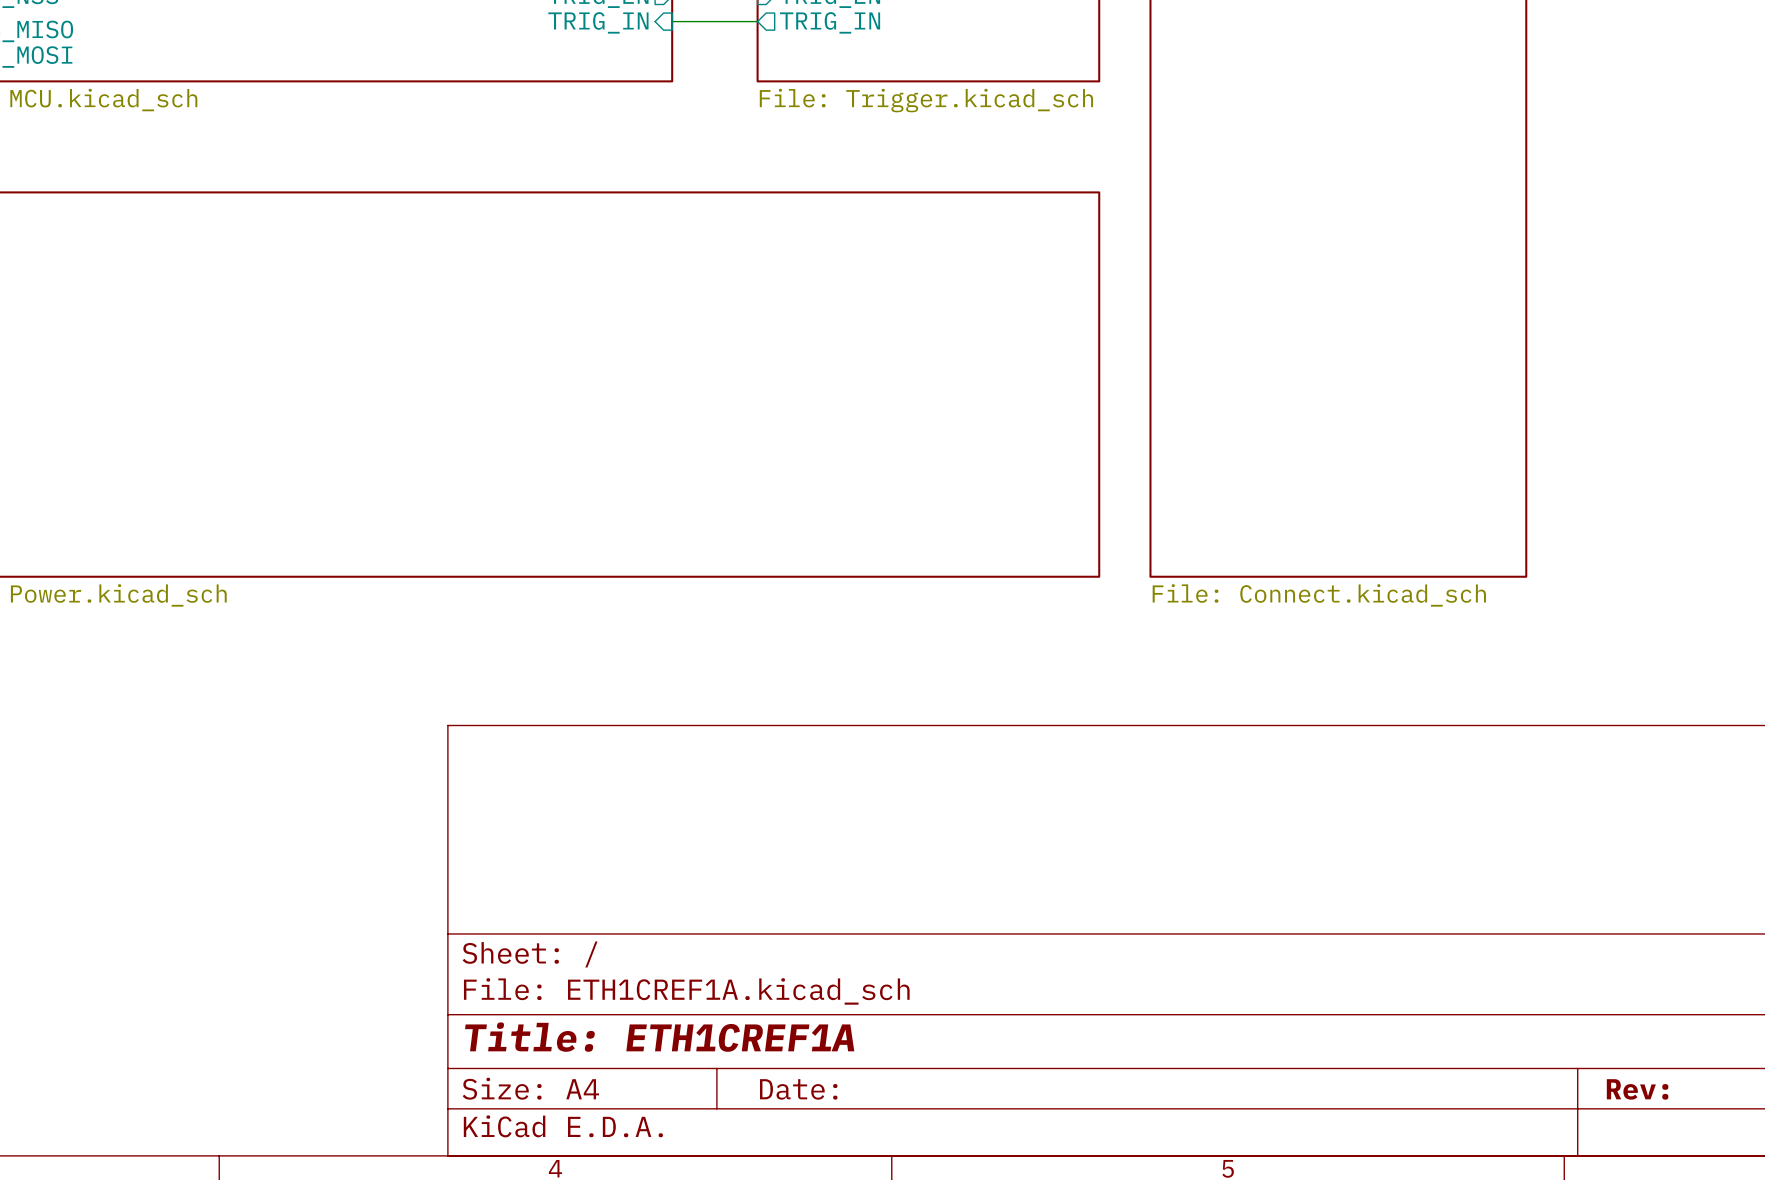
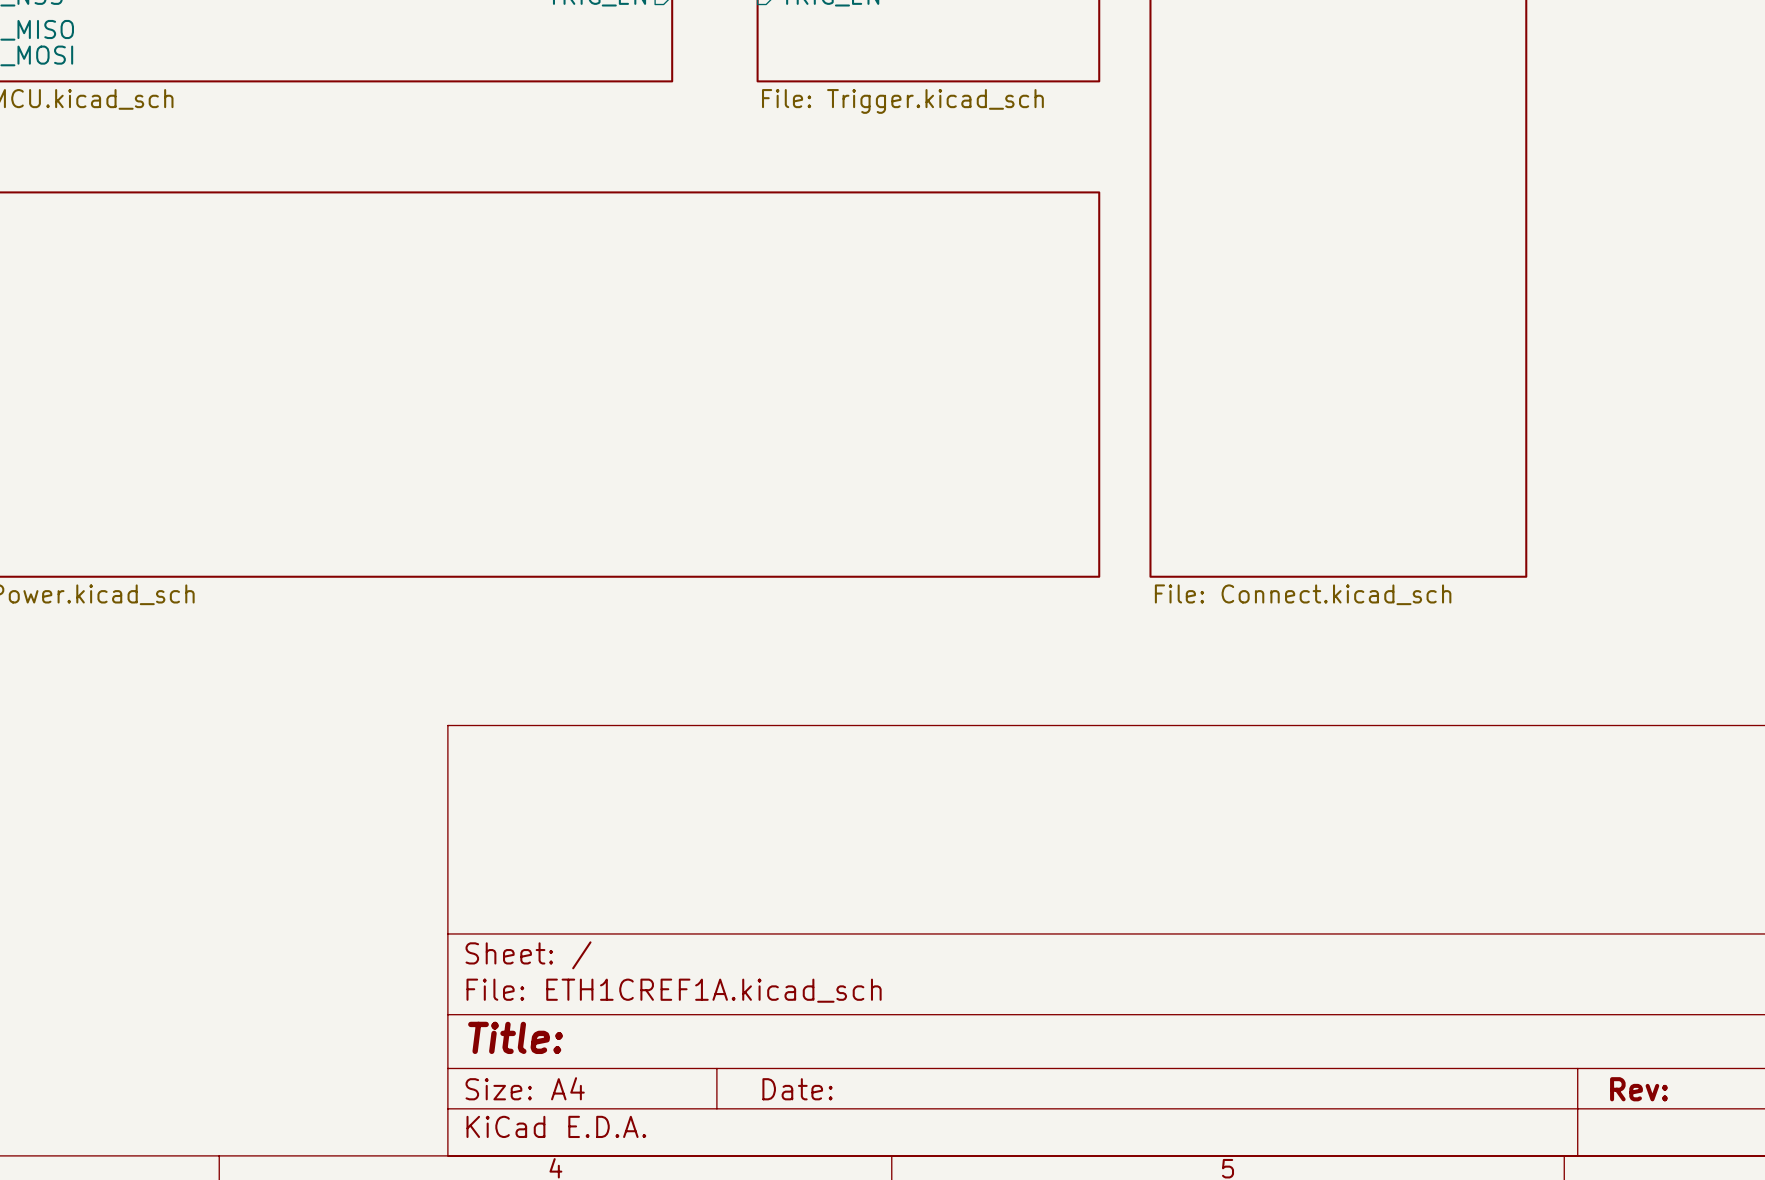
wire: (672, 21) (757, 21) -> none
sheet pin: TRIG_IN (598, 22) -> none
sheet pin: TRIG_IN (830, 22) -> none
title block: Title: ETH1CREF1A (659, 1037) -> Title: (515, 1037)

